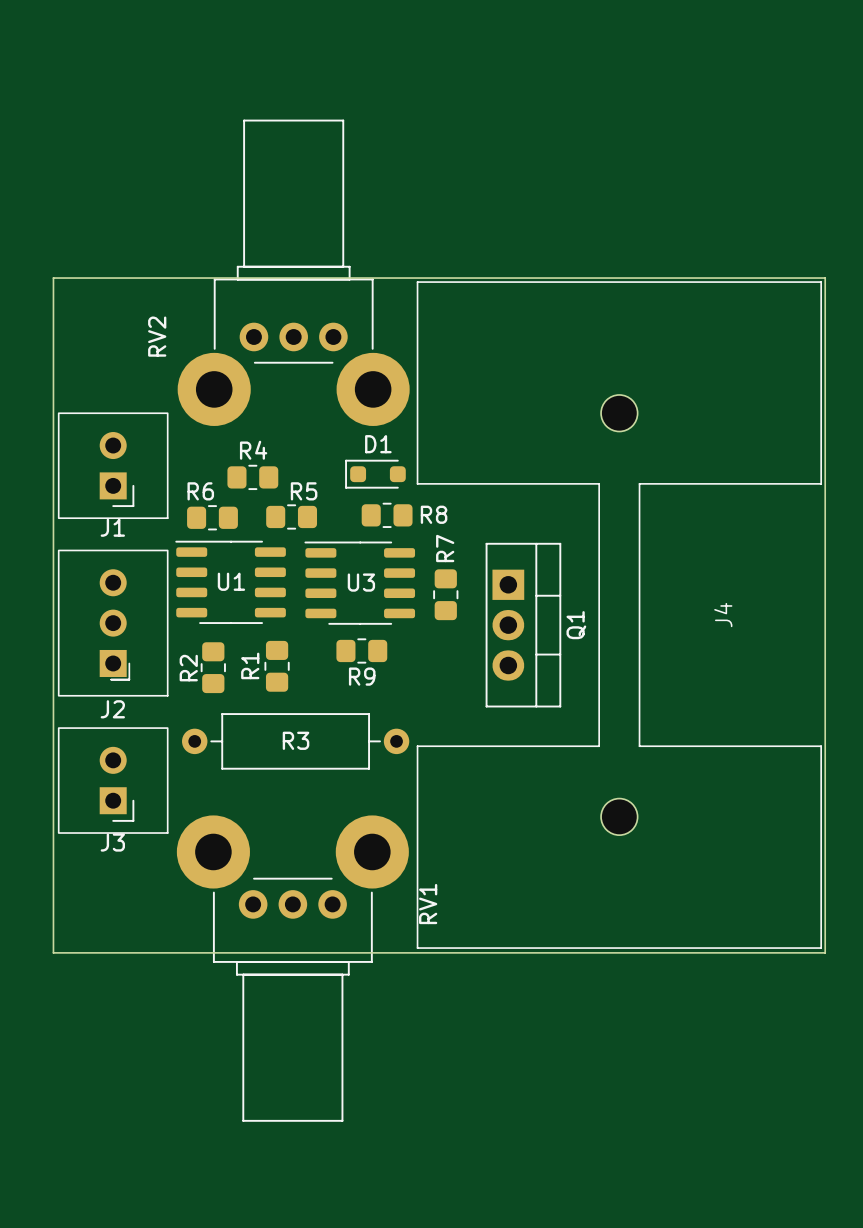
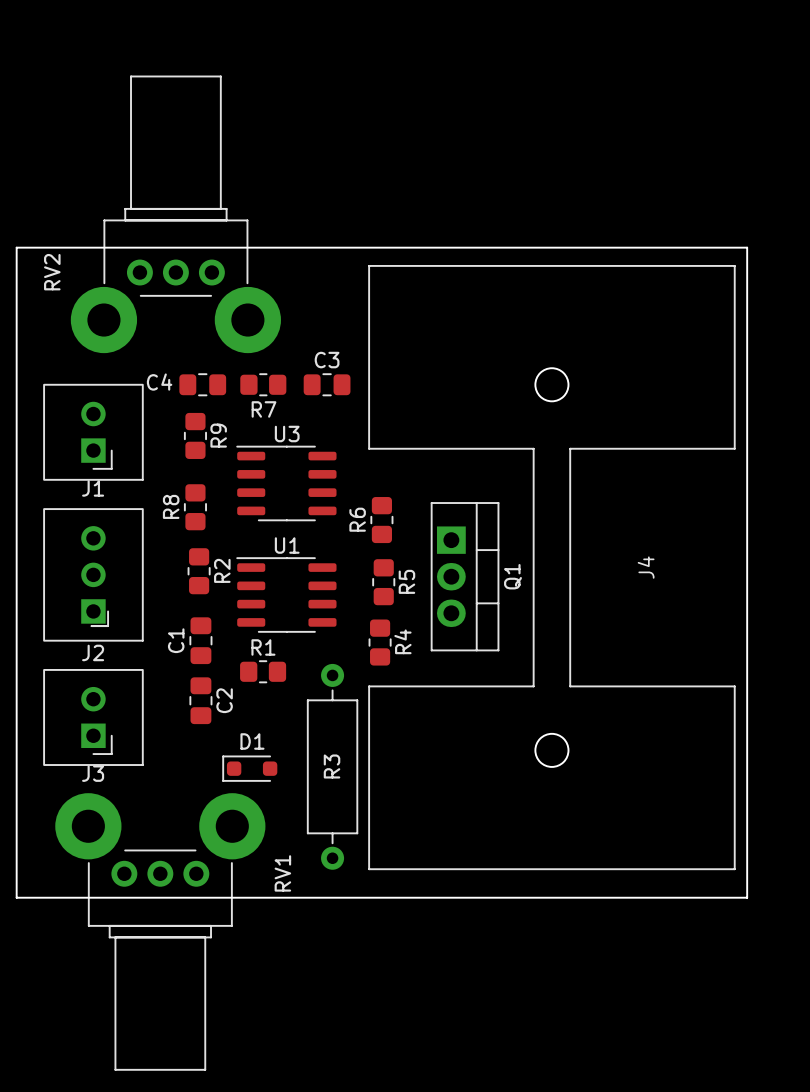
RV2 position: (293, 272) -> (175, 214)
board edge: (53, 278) (825, 278) (825, 952) (53, 952) (53, 278) -> (16, 247) (16, 897) (747, 897) (747, 247) (16, 247)
C4: none -> (202, 384)
C3: none -> (327, 384)
D1 position: (375, 474) -> (249, 768)
R4 rotation: 0° (252, 477) -> 90° clockwise (380, 642)
R4 position: (252, 477) -> (380, 642)
R8 name position: R8 (434, 514) -> R8 (171, 506)
R8 rotation: 0° (387, 515) -> 90° clockwise (195, 507)
R8 position: (387, 515) -> (195, 507)
R5 rotation: 0° (291, 516) -> 90° clockwise (383, 582)
R5 position: (291, 516) -> (383, 582)
R6 rotation: 0° (212, 517) -> 90° clockwise (381, 520)
R6 position: (212, 517) -> (381, 520)
R7 name position: R7 (445, 548) -> R7 (264, 409)
U1 name position: U1 (231, 581) -> U1 (287, 545)
U1 position: (230, 582) -> (286, 594)
U3 name position: U3 (361, 582) -> U3 (287, 434)
U3 position: (359, 583) -> (286, 483)
R7 rotation: 0° (445, 594) -> 90° clockwise (263, 384)
R7 position: (445, 594) -> (263, 384)
R9 rotation: 0° (361, 650) -> 90° clockwise (195, 435)
R9 position: (361, 650) -> (195, 435)
R1 rotation: 0° (277, 666) -> 90° clockwise (263, 671)
R1 position: (277, 666) -> (263, 671)
R2 position: (213, 667) -> (199, 571)
R2 name position: R2 (188, 668) -> R2 (222, 570)
R9 name position: R9 (362, 676) -> R9 (218, 435)
C1: none -> (200, 640)
R3 rotation: 0° (295, 741) -> 90° clockwise (332, 766)
C2: none -> (200, 700)
RV1 position: (292, 968) -> (160, 931)

